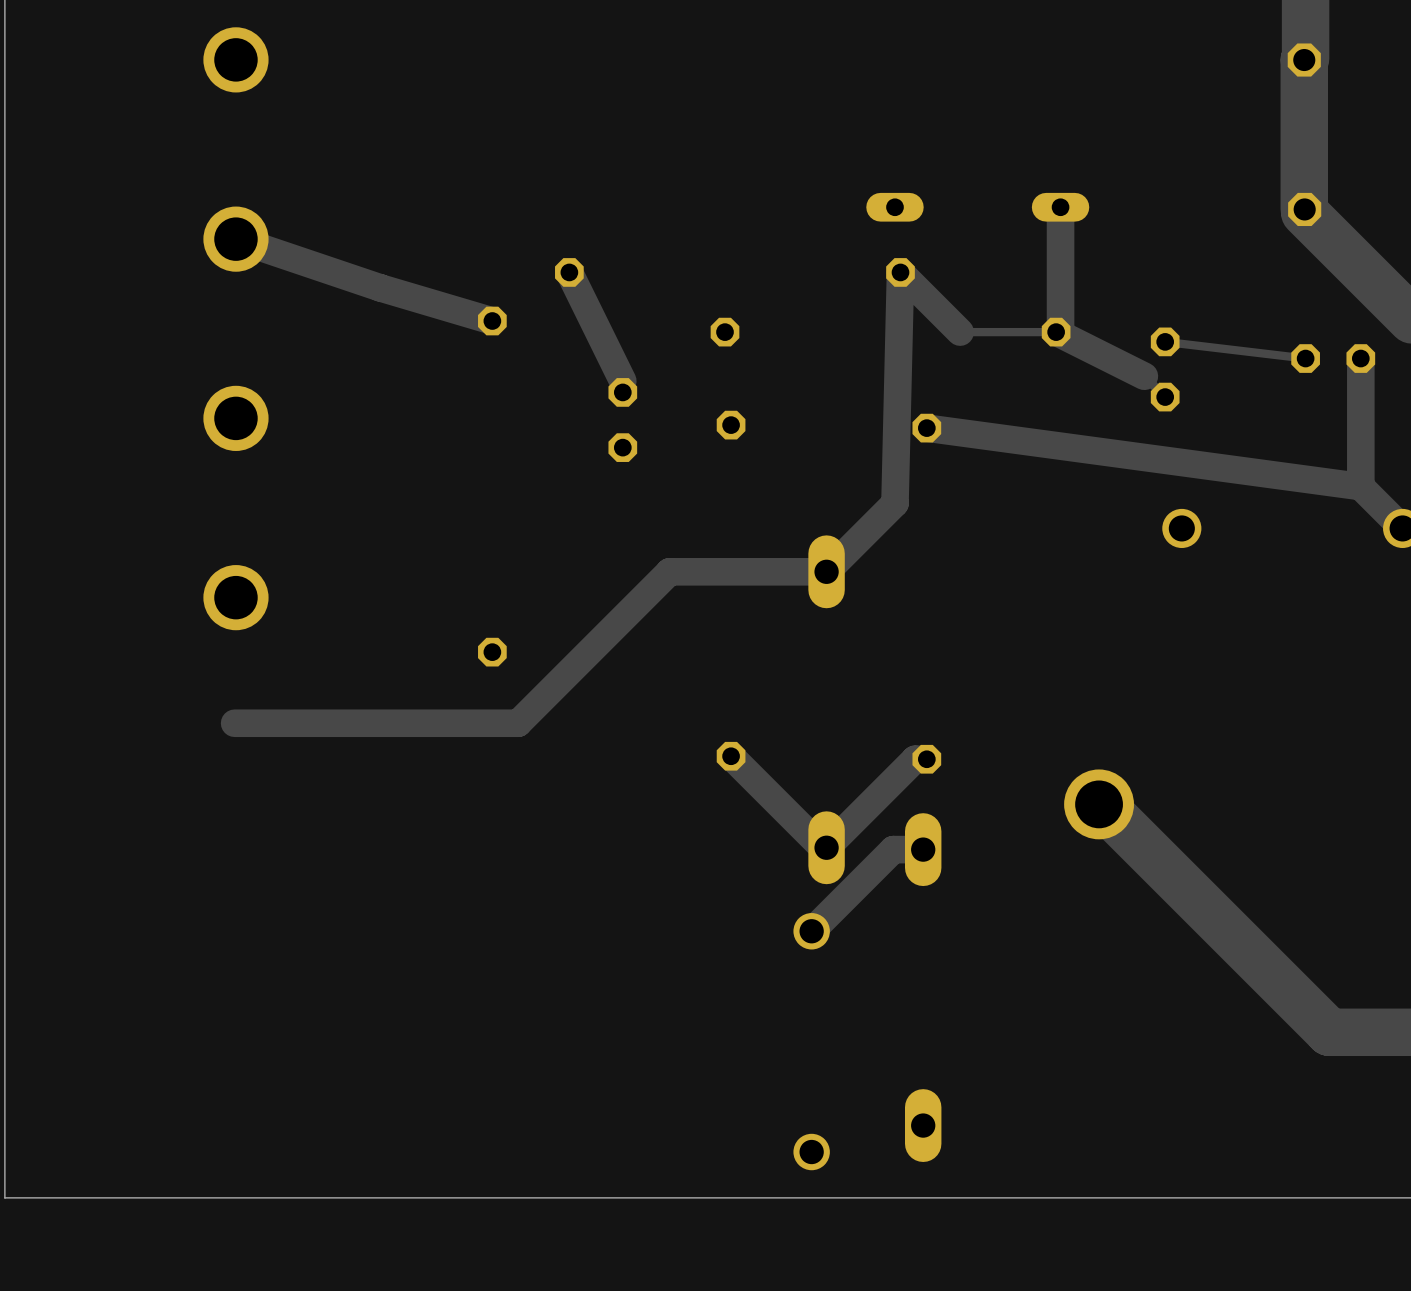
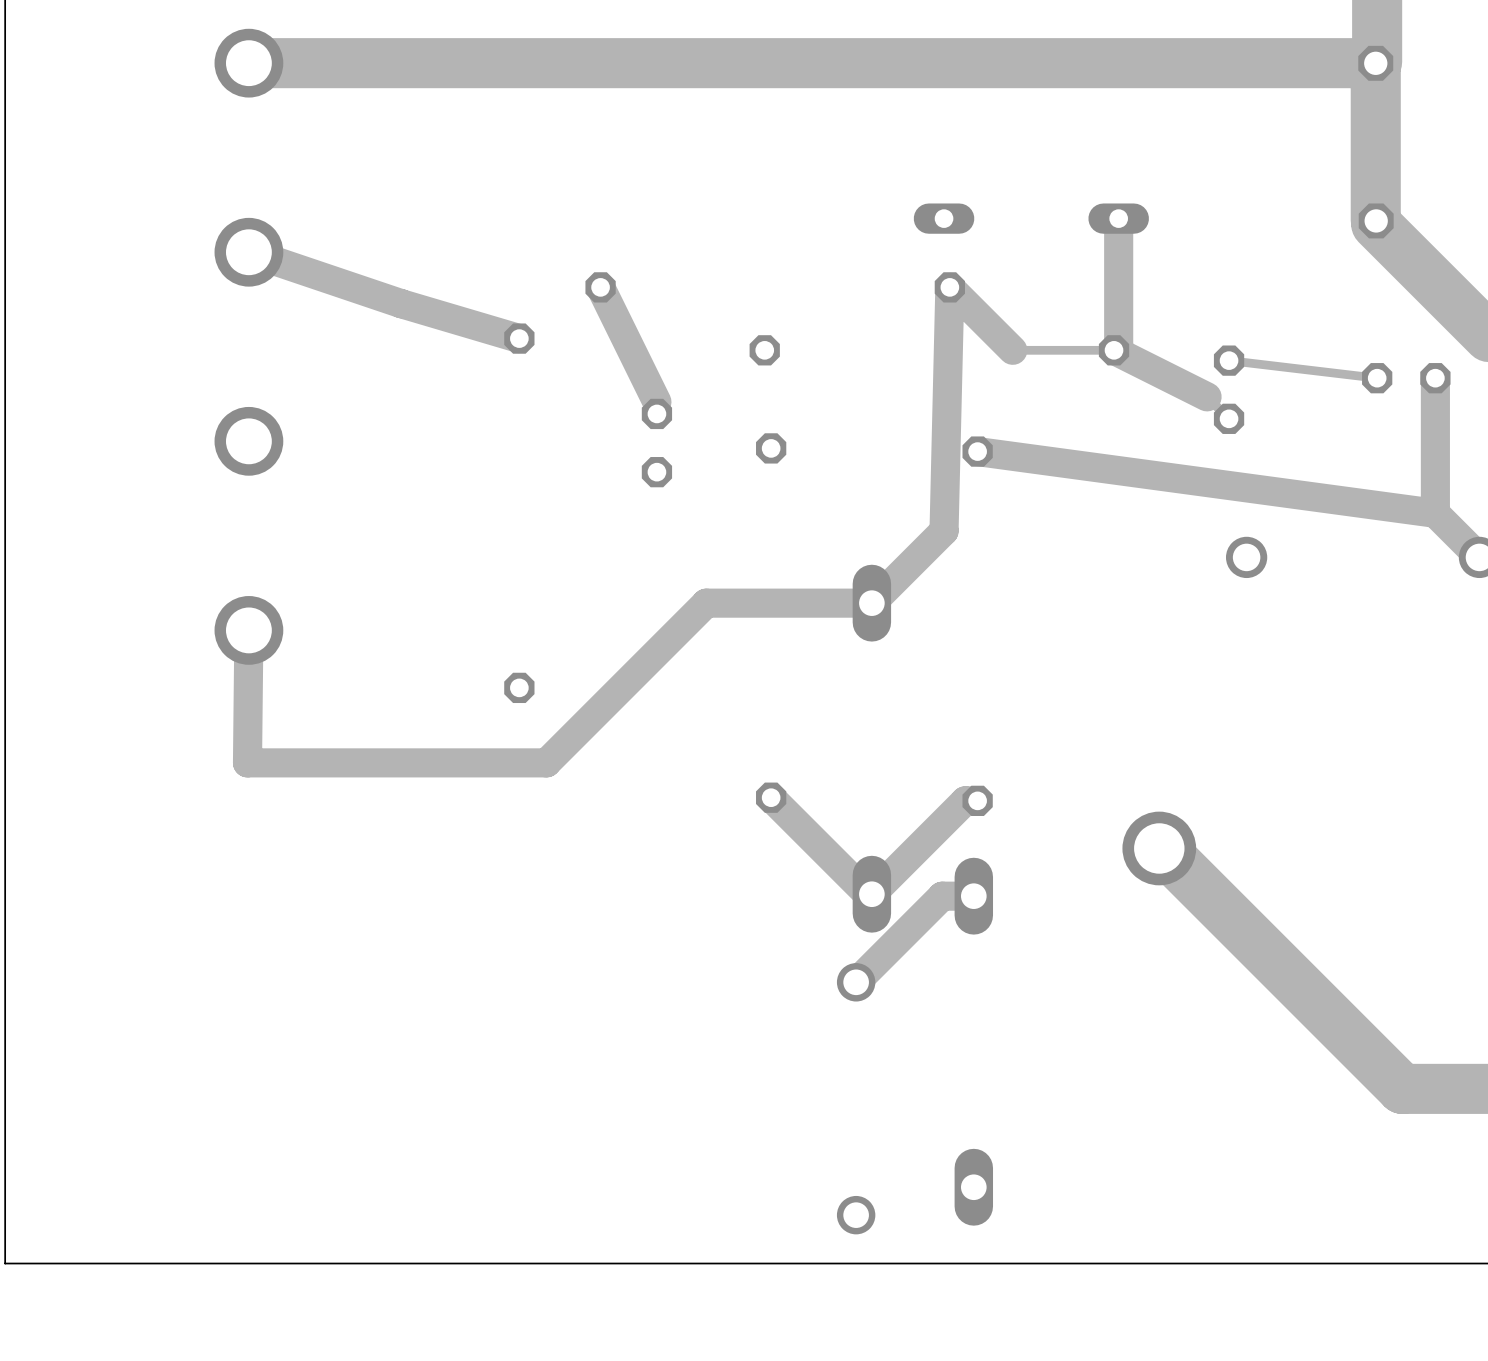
track: none -> (1375, 63) (248, 63)
track: none -> (248, 630) (247, 762)

